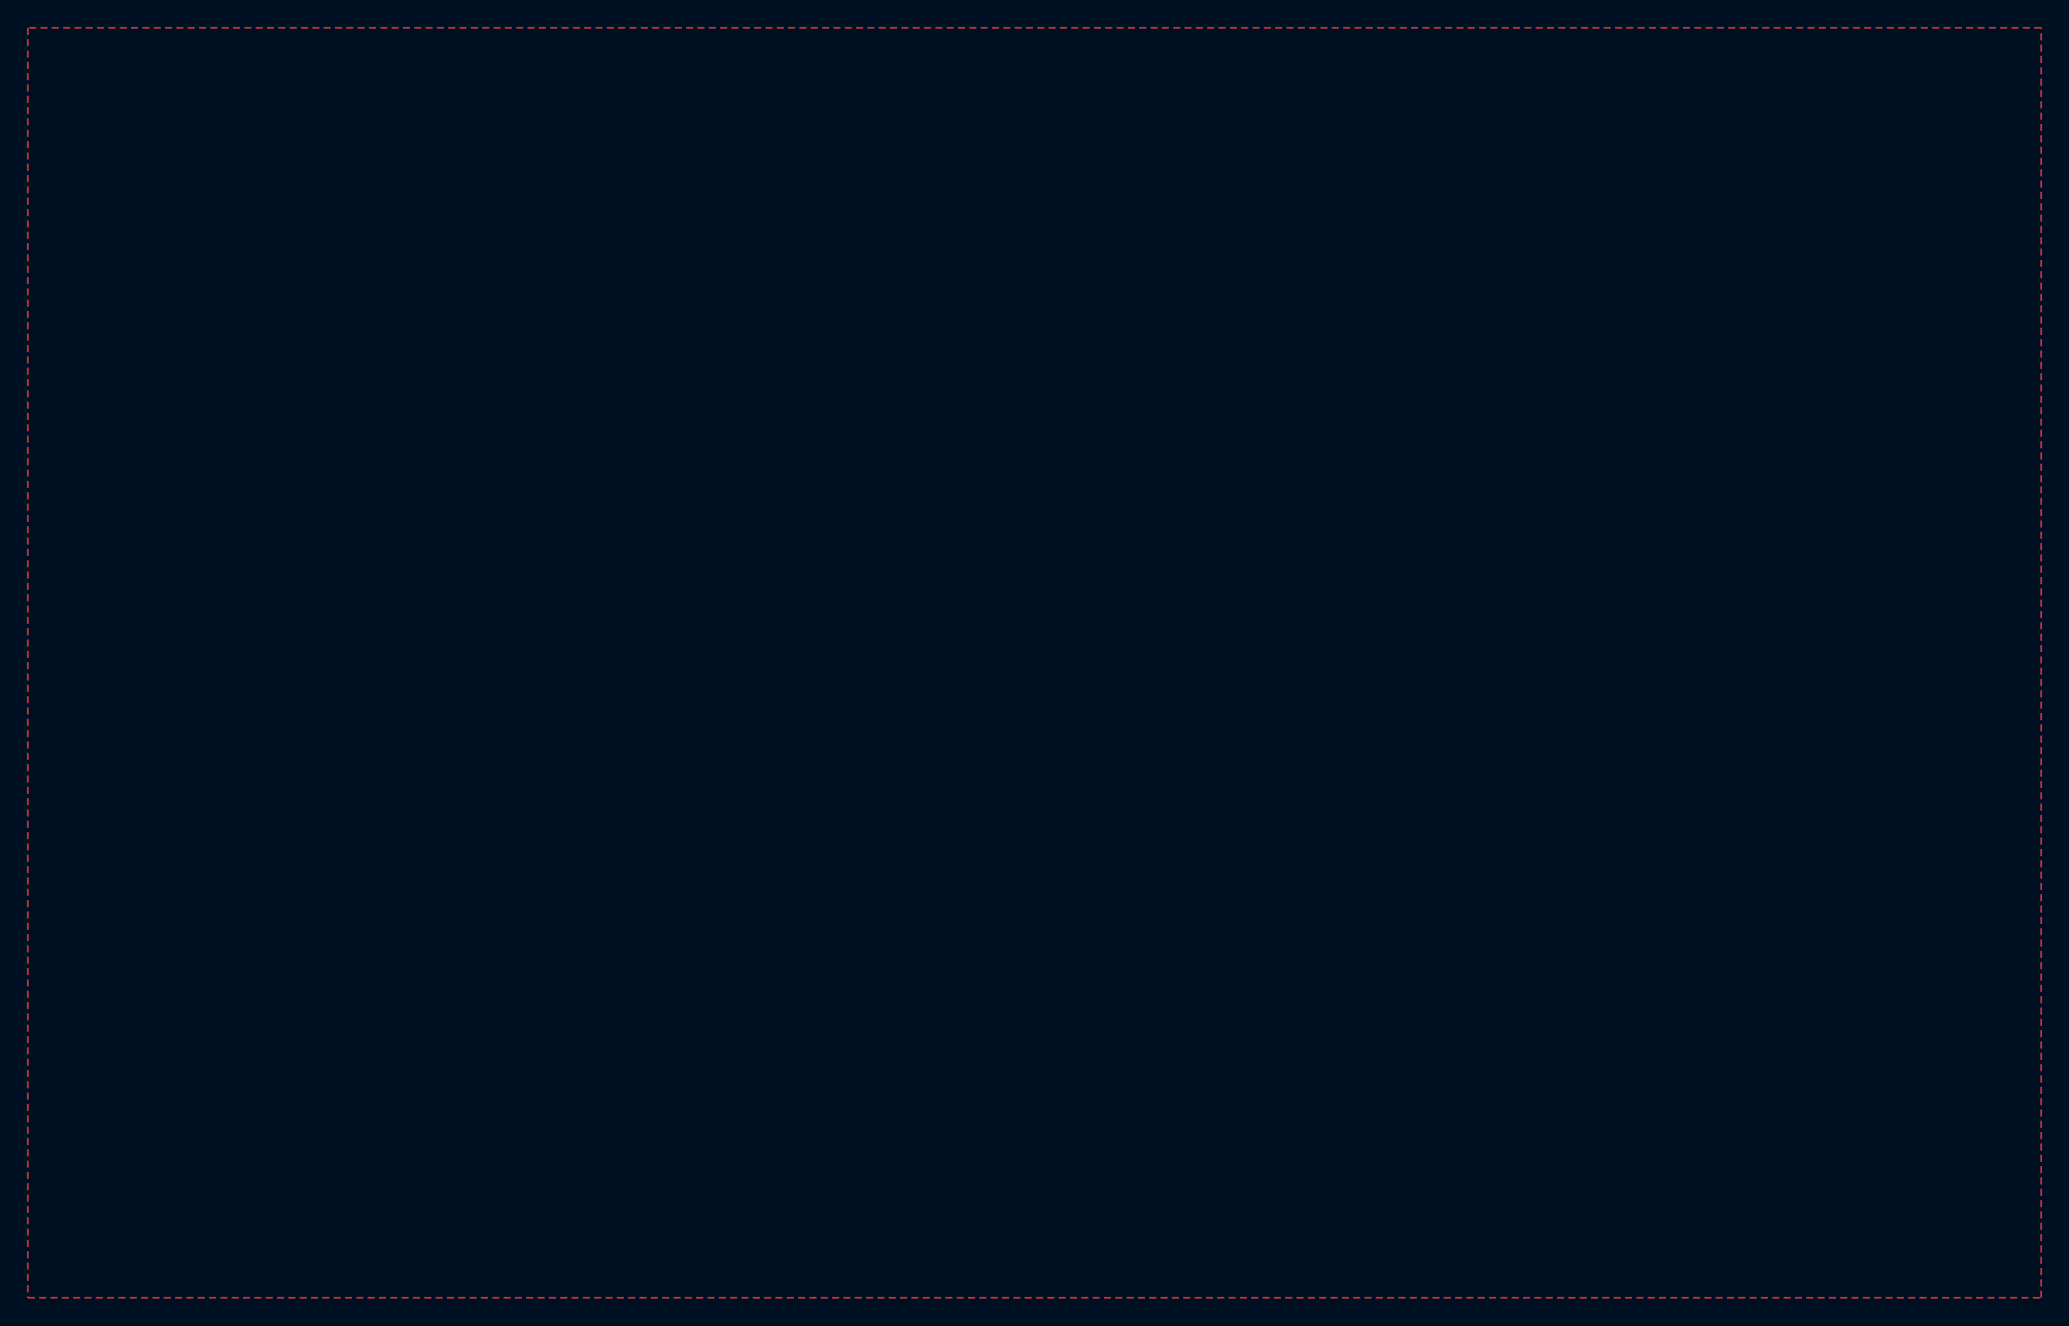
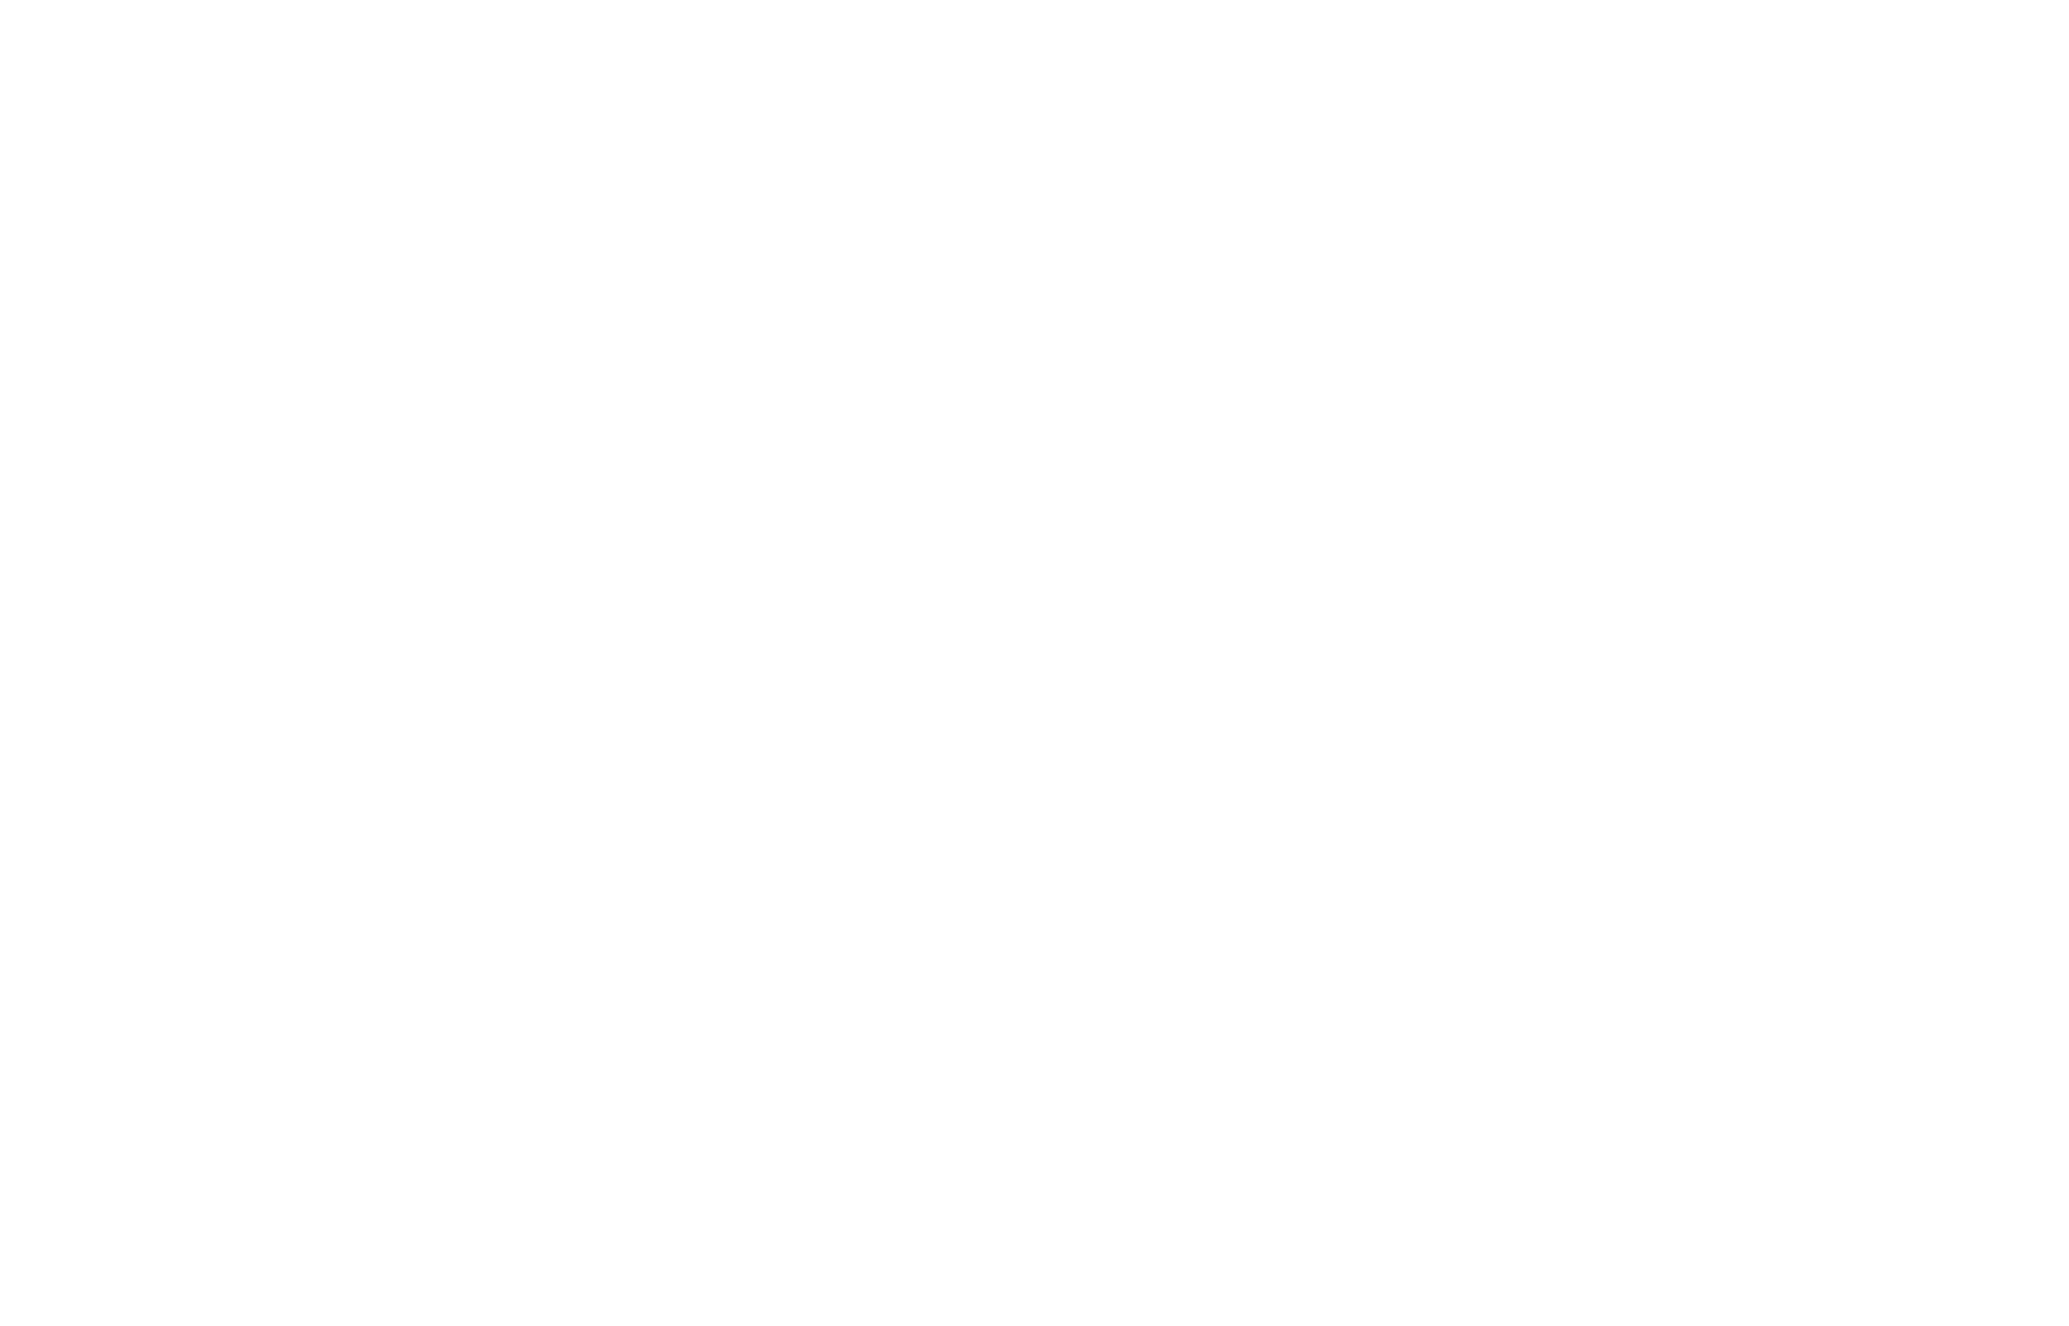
zone outline: (27, 27) (27, 1297) (2041, 1297) (2041, 27) (27, 27) -> none

